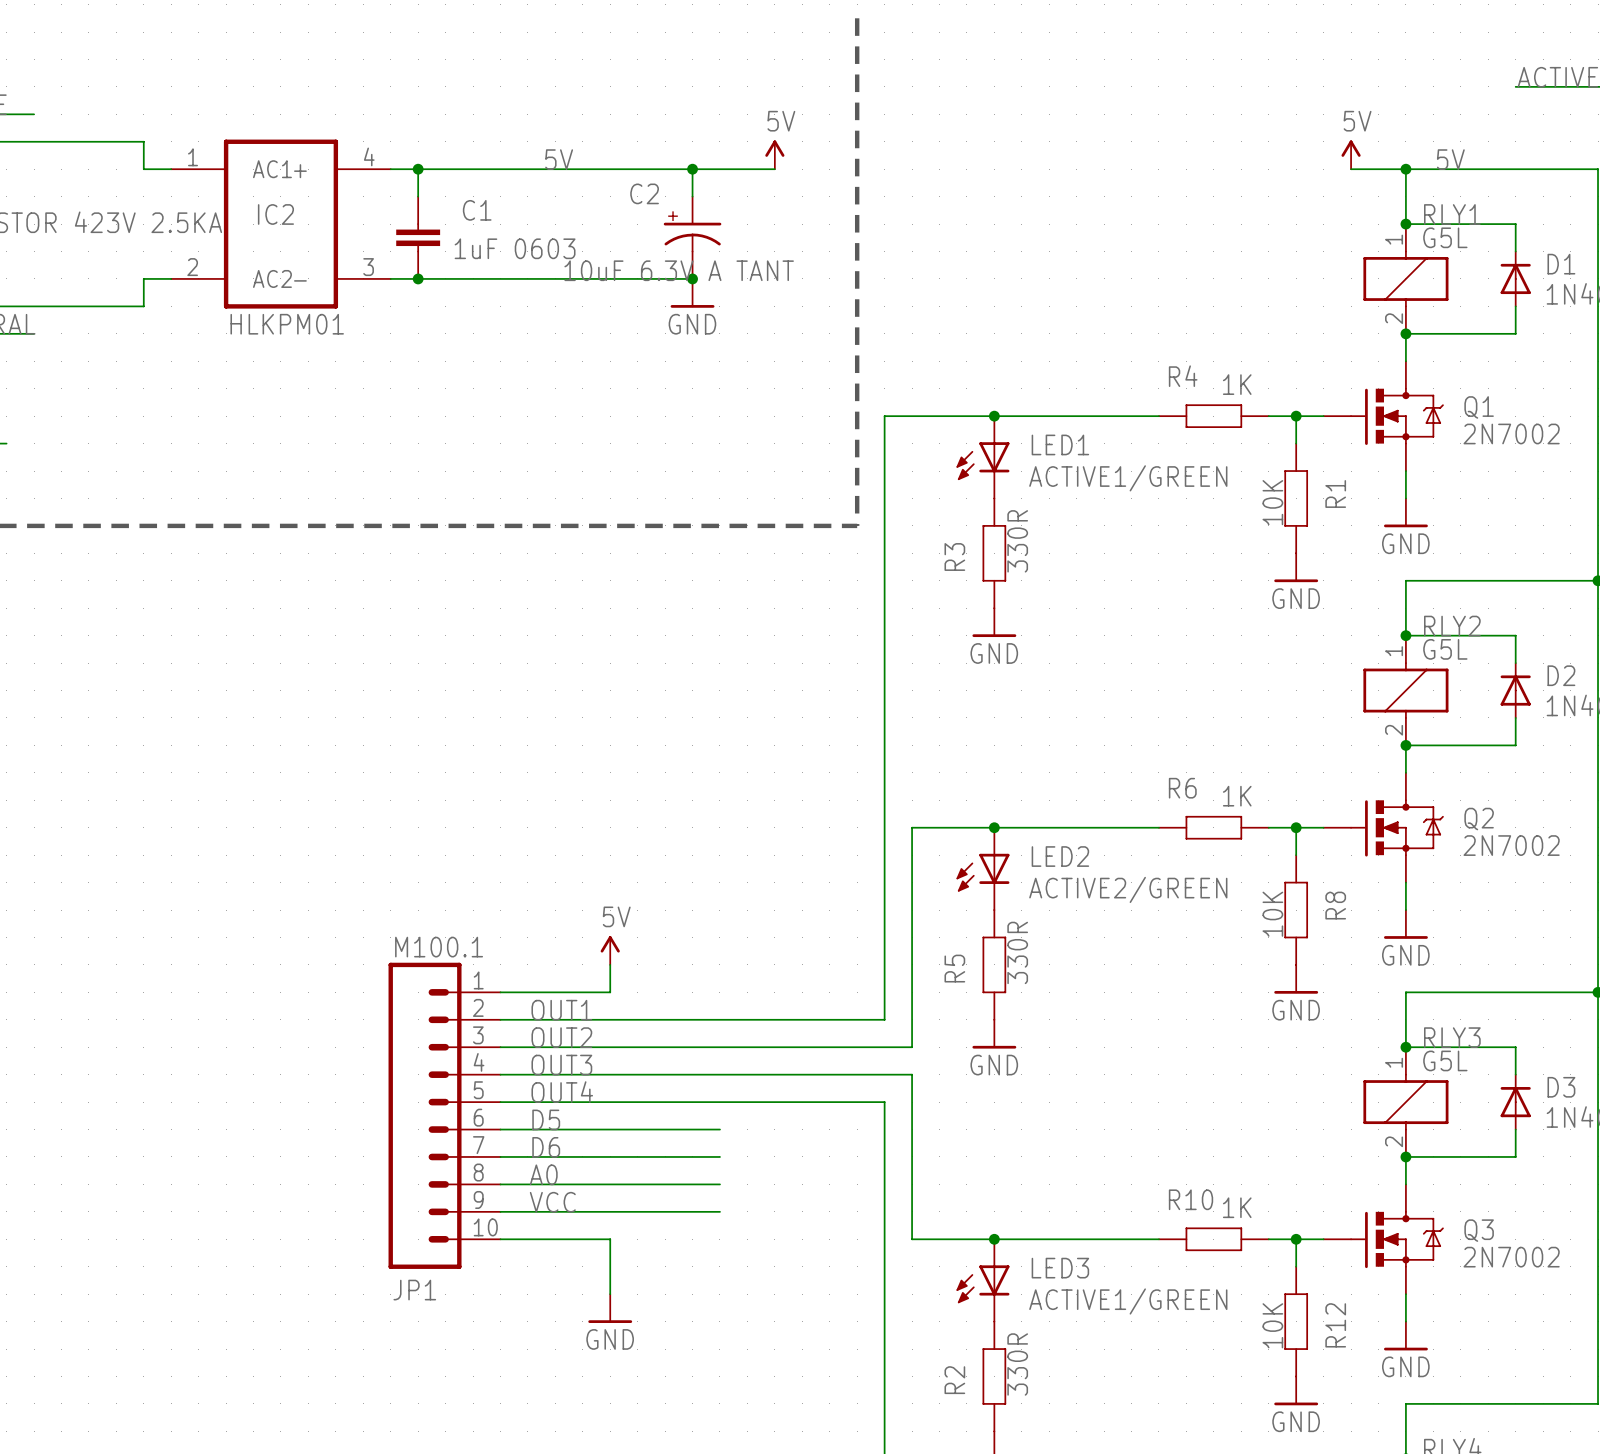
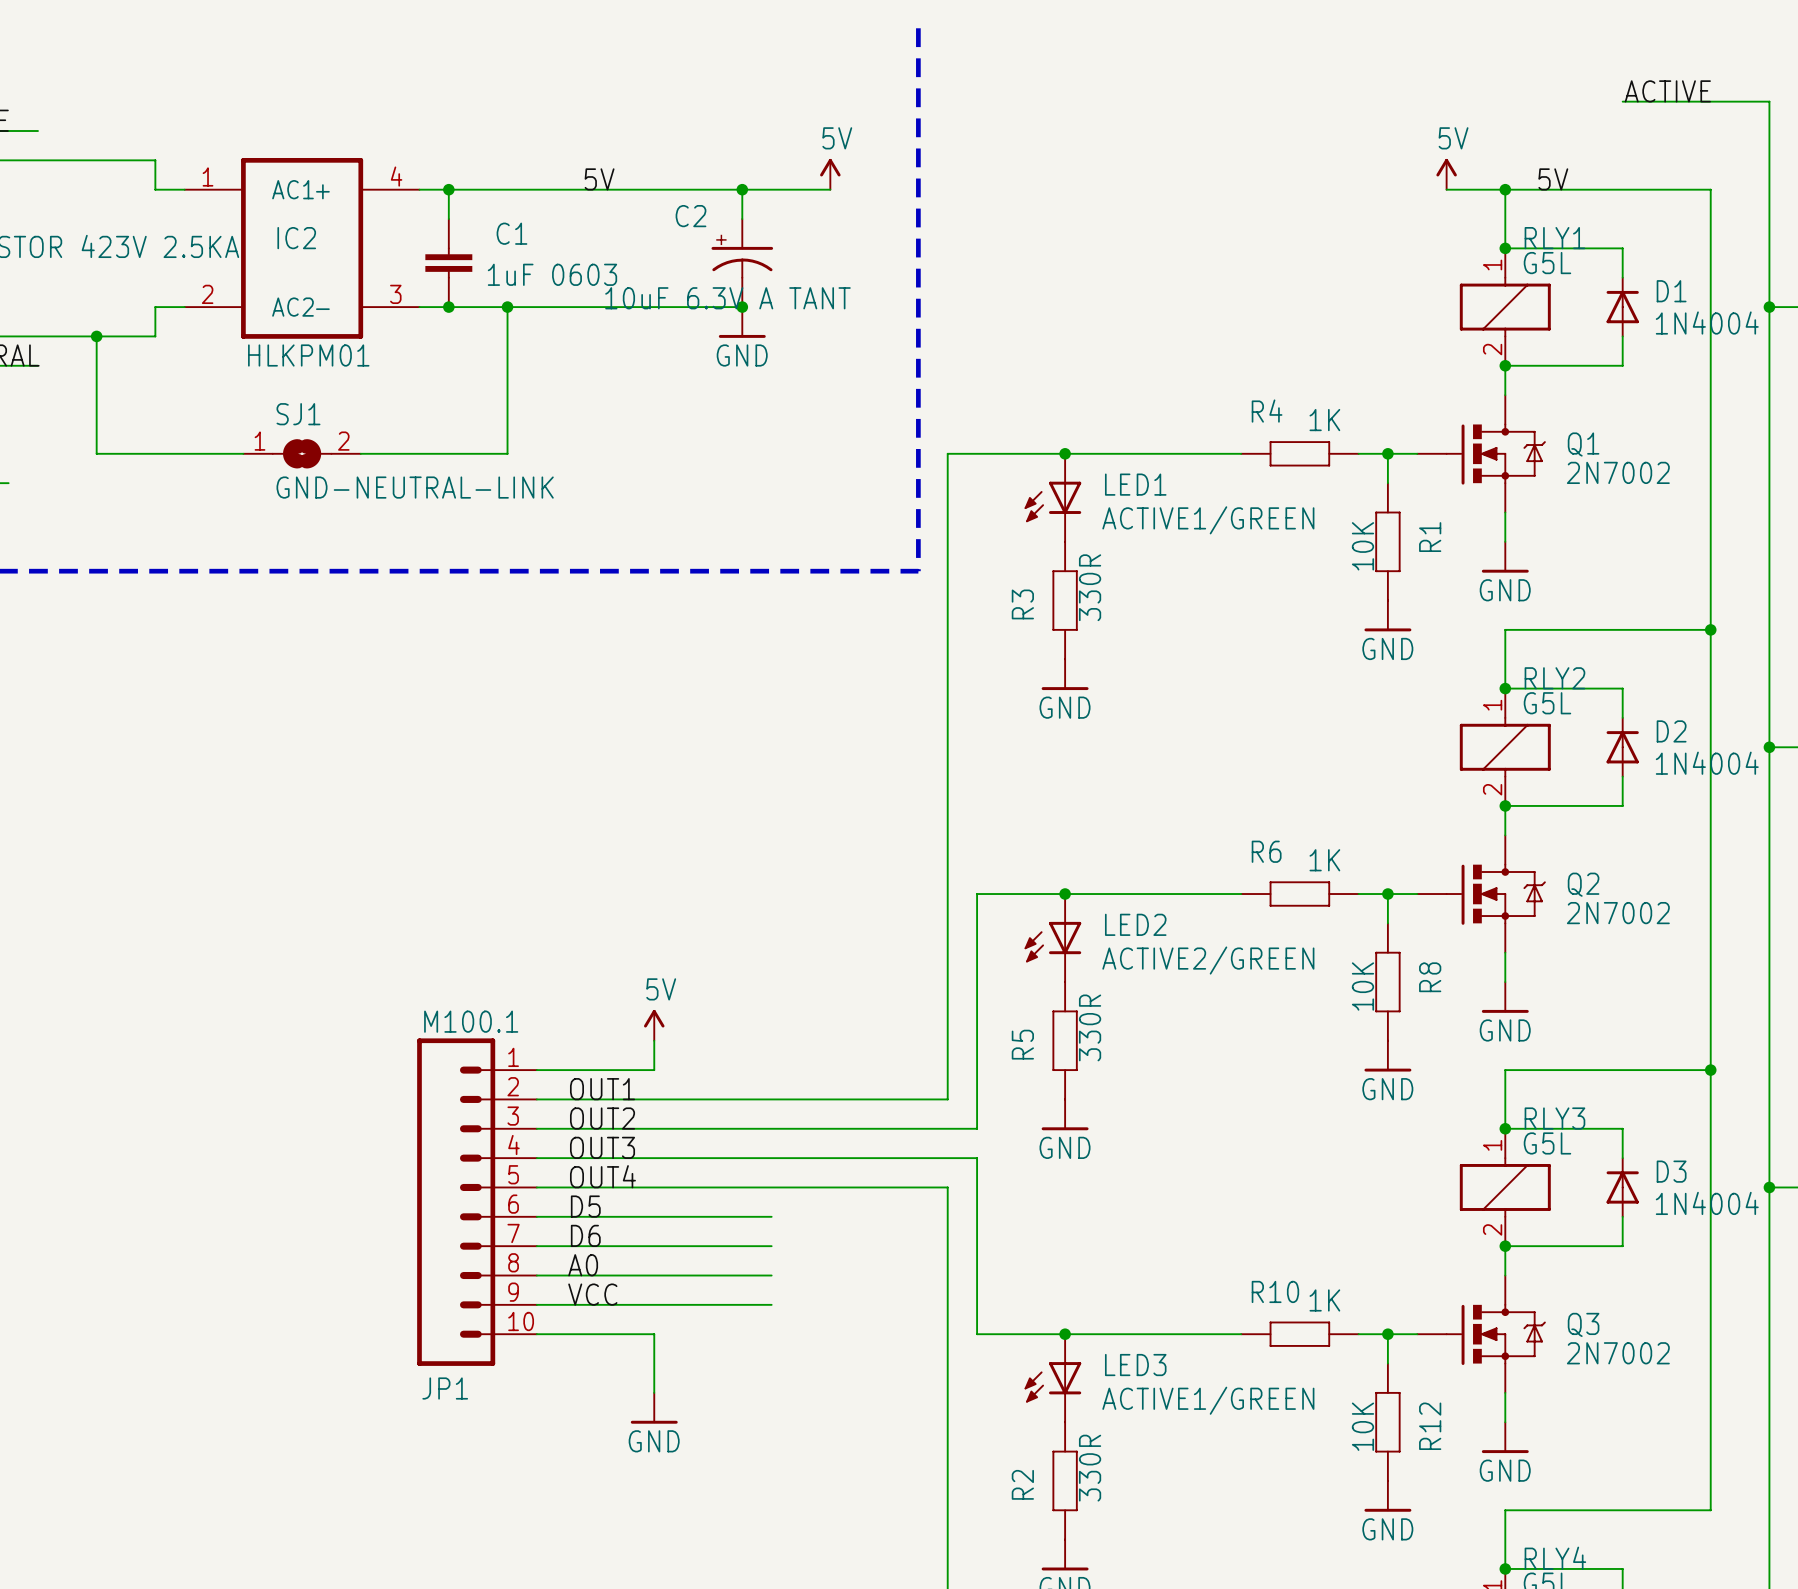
wire: none -> (507, 307) (507, 453) (360, 453)
junction: none -> (507, 307)
wire: none -> (96, 336) (96, 453) (243, 453)
junction: none -> (96, 336)
SJ1: none -> GND-NEUTRAL-LINK (302, 453)

